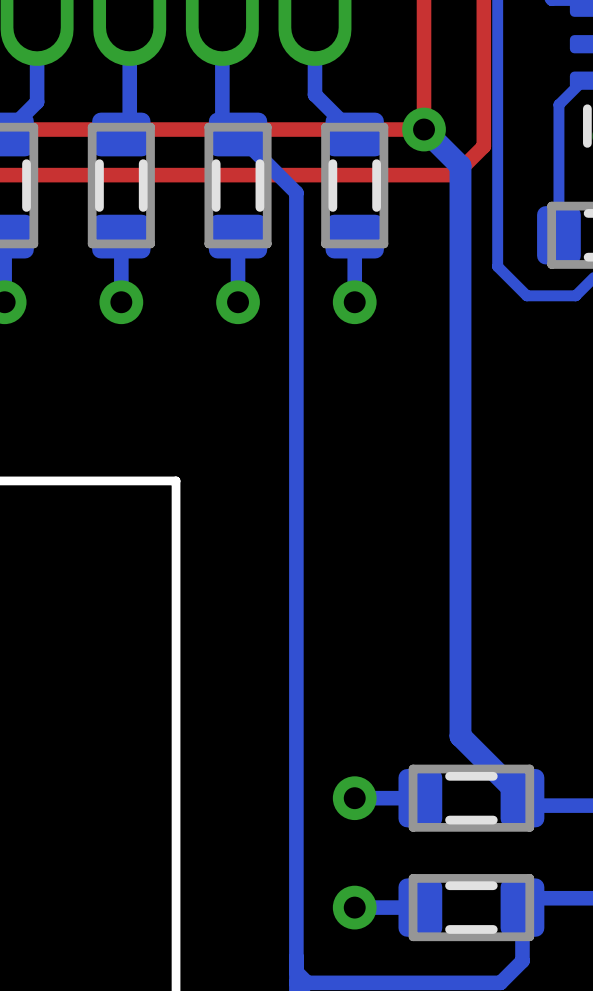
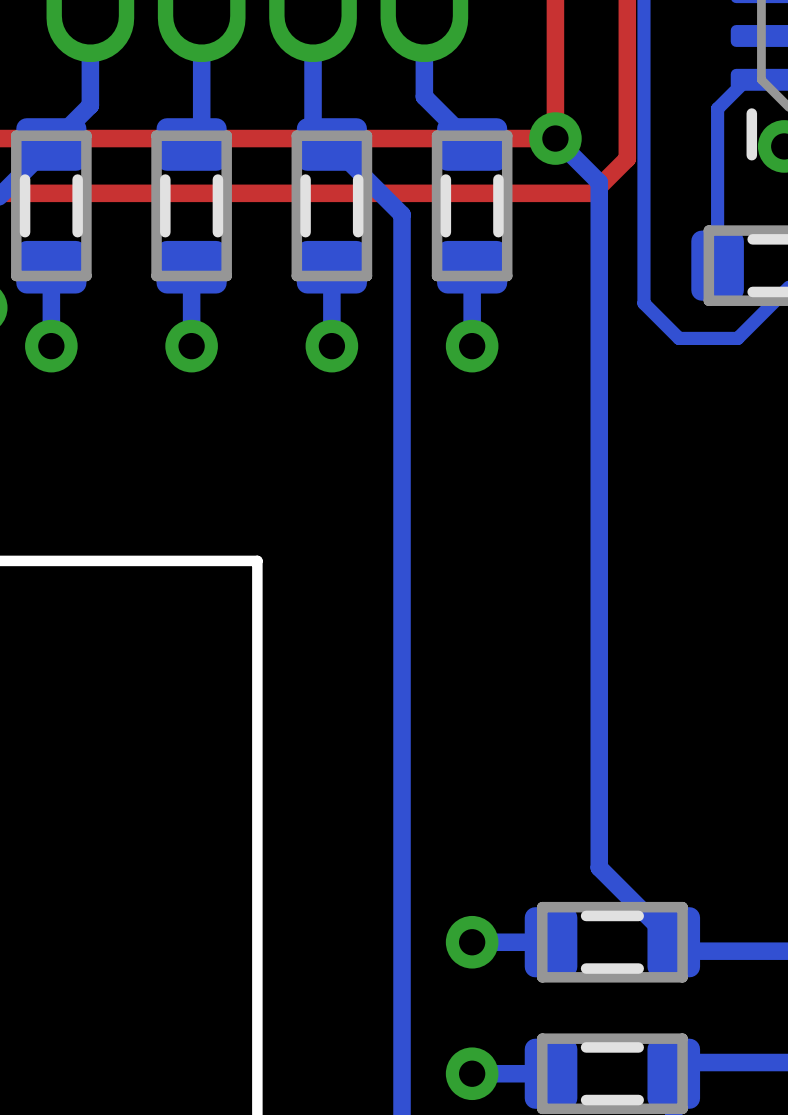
bottom track width: thick (424, 129) (460, 166) (460, 736) (522, 798) -> thin (555, 138) (599, 182) (599, 867) (673, 942)

